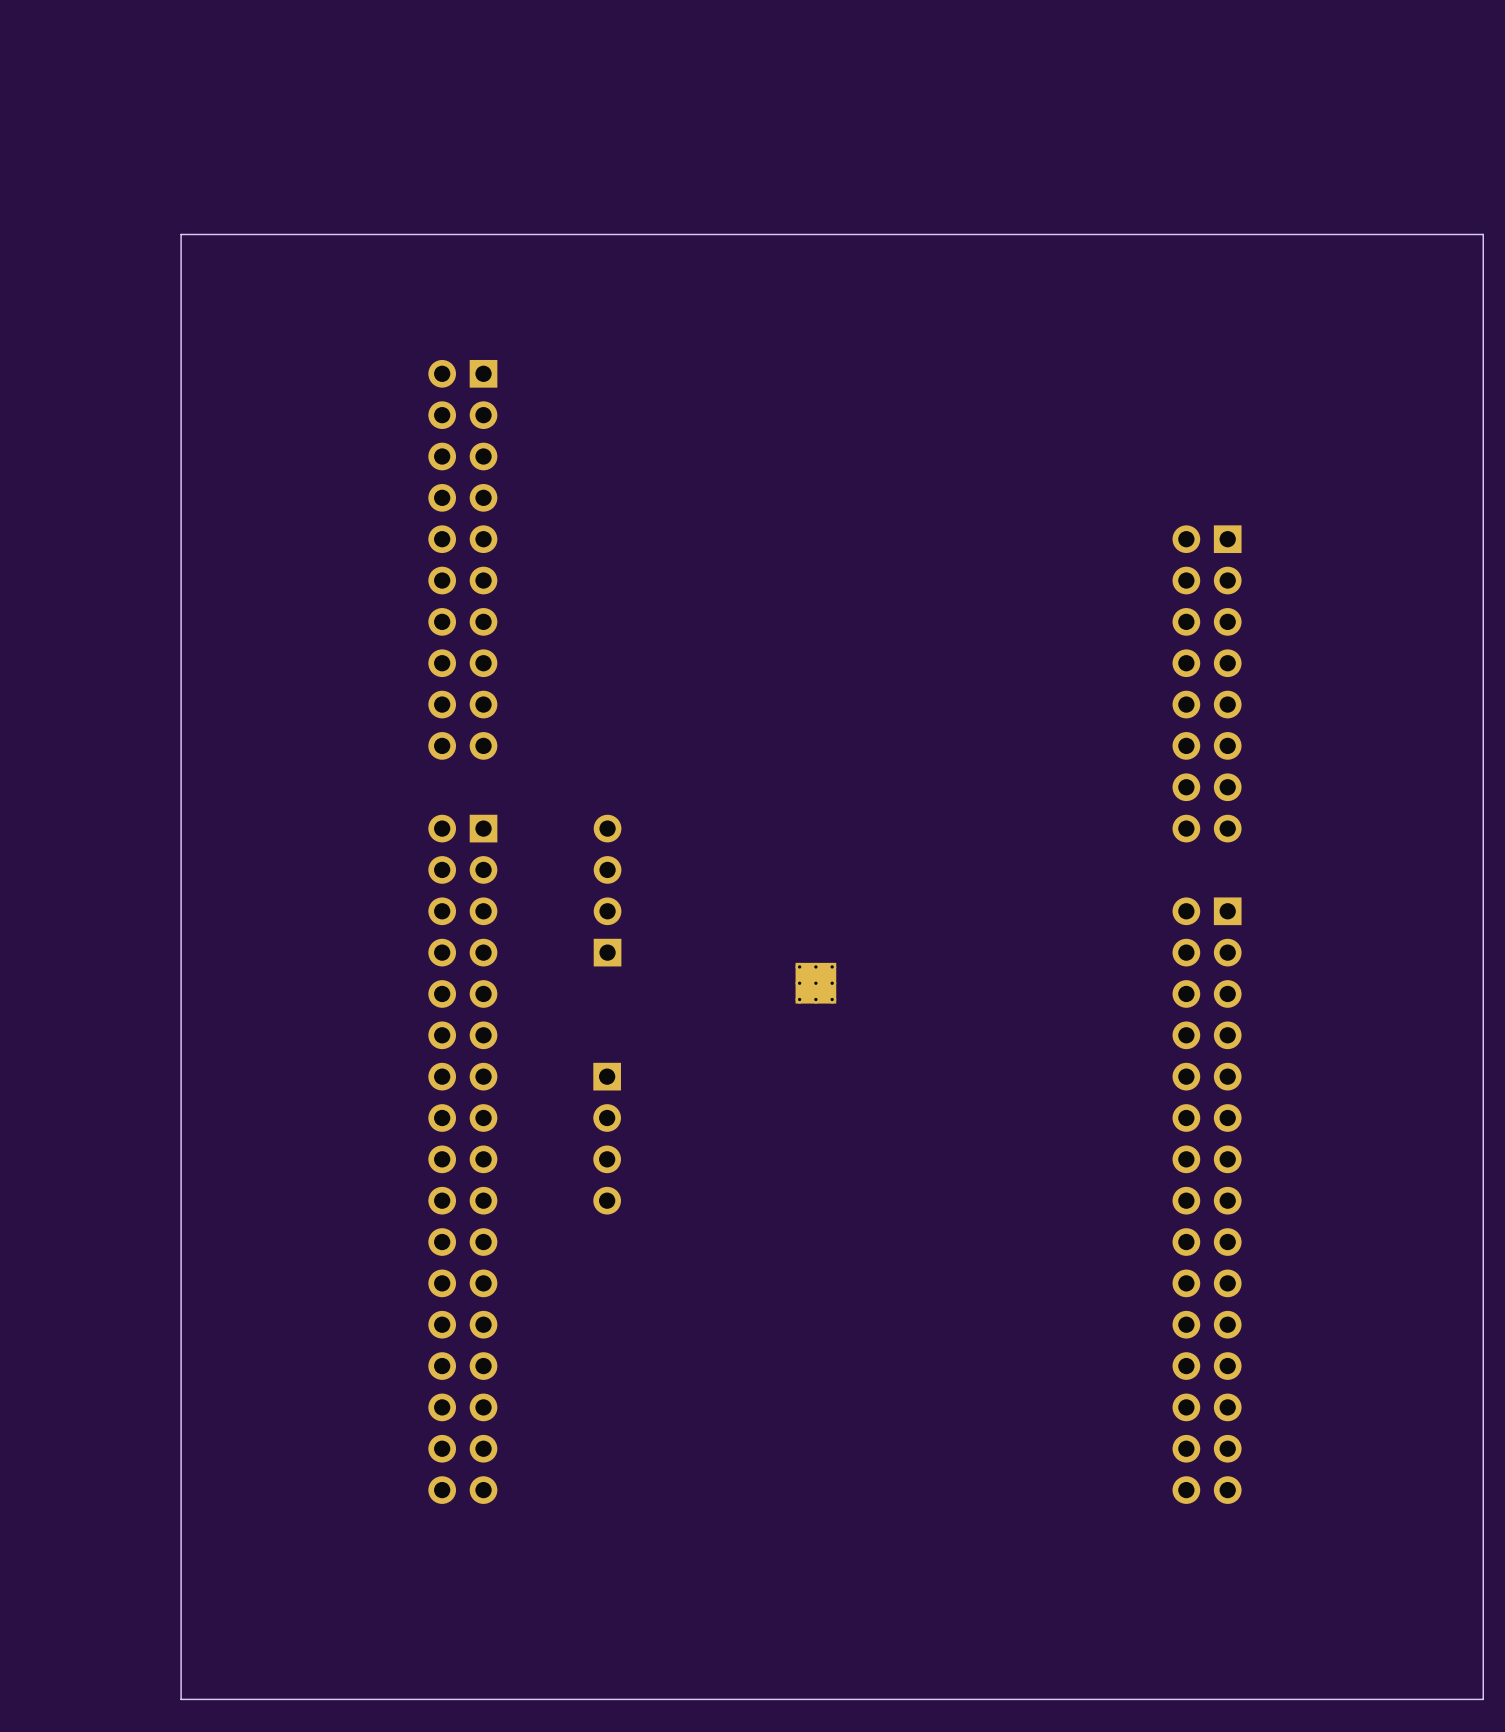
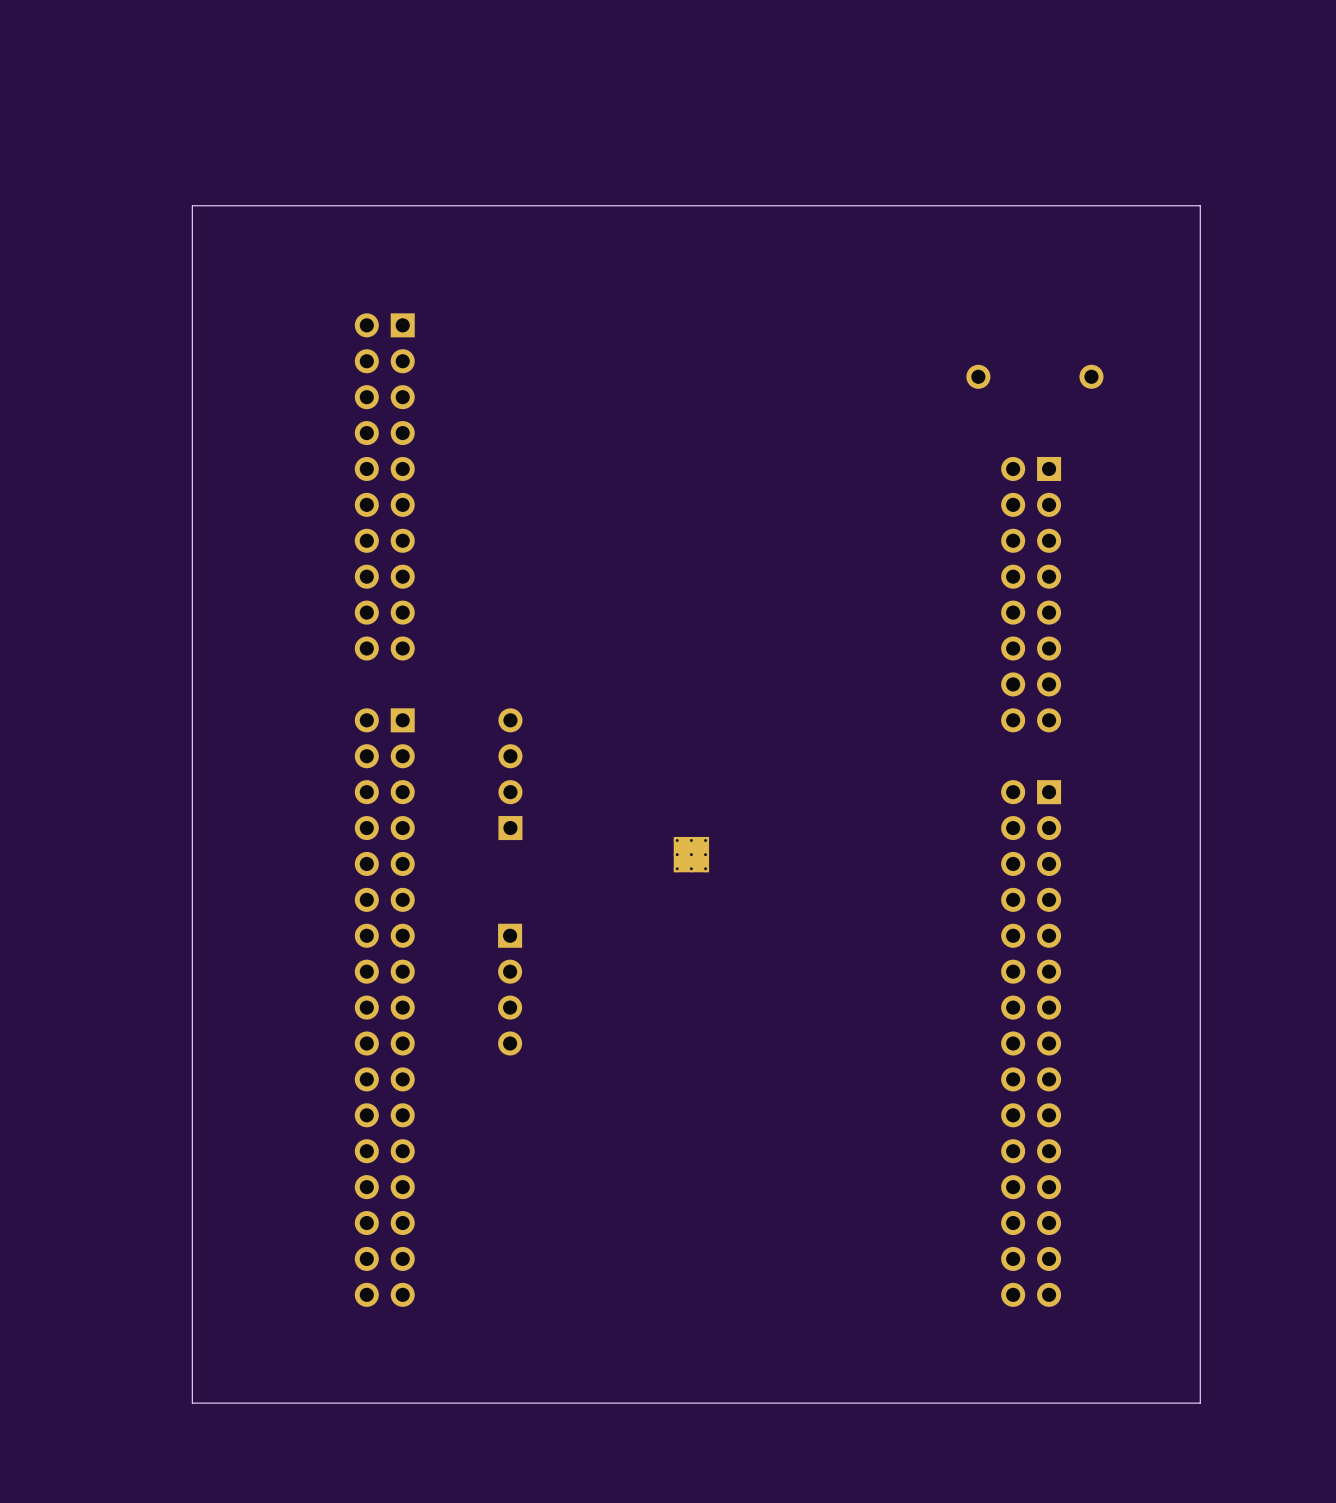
board edge: (1483, 234) (181, 234) (181, 1699) (1483, 1699) (1483, 234) -> (1200, 205) (1200, 1403) (192, 1403) (192, 205) (1200, 205)
part: none -> (978, 376)
part: none -> (1091, 376)

